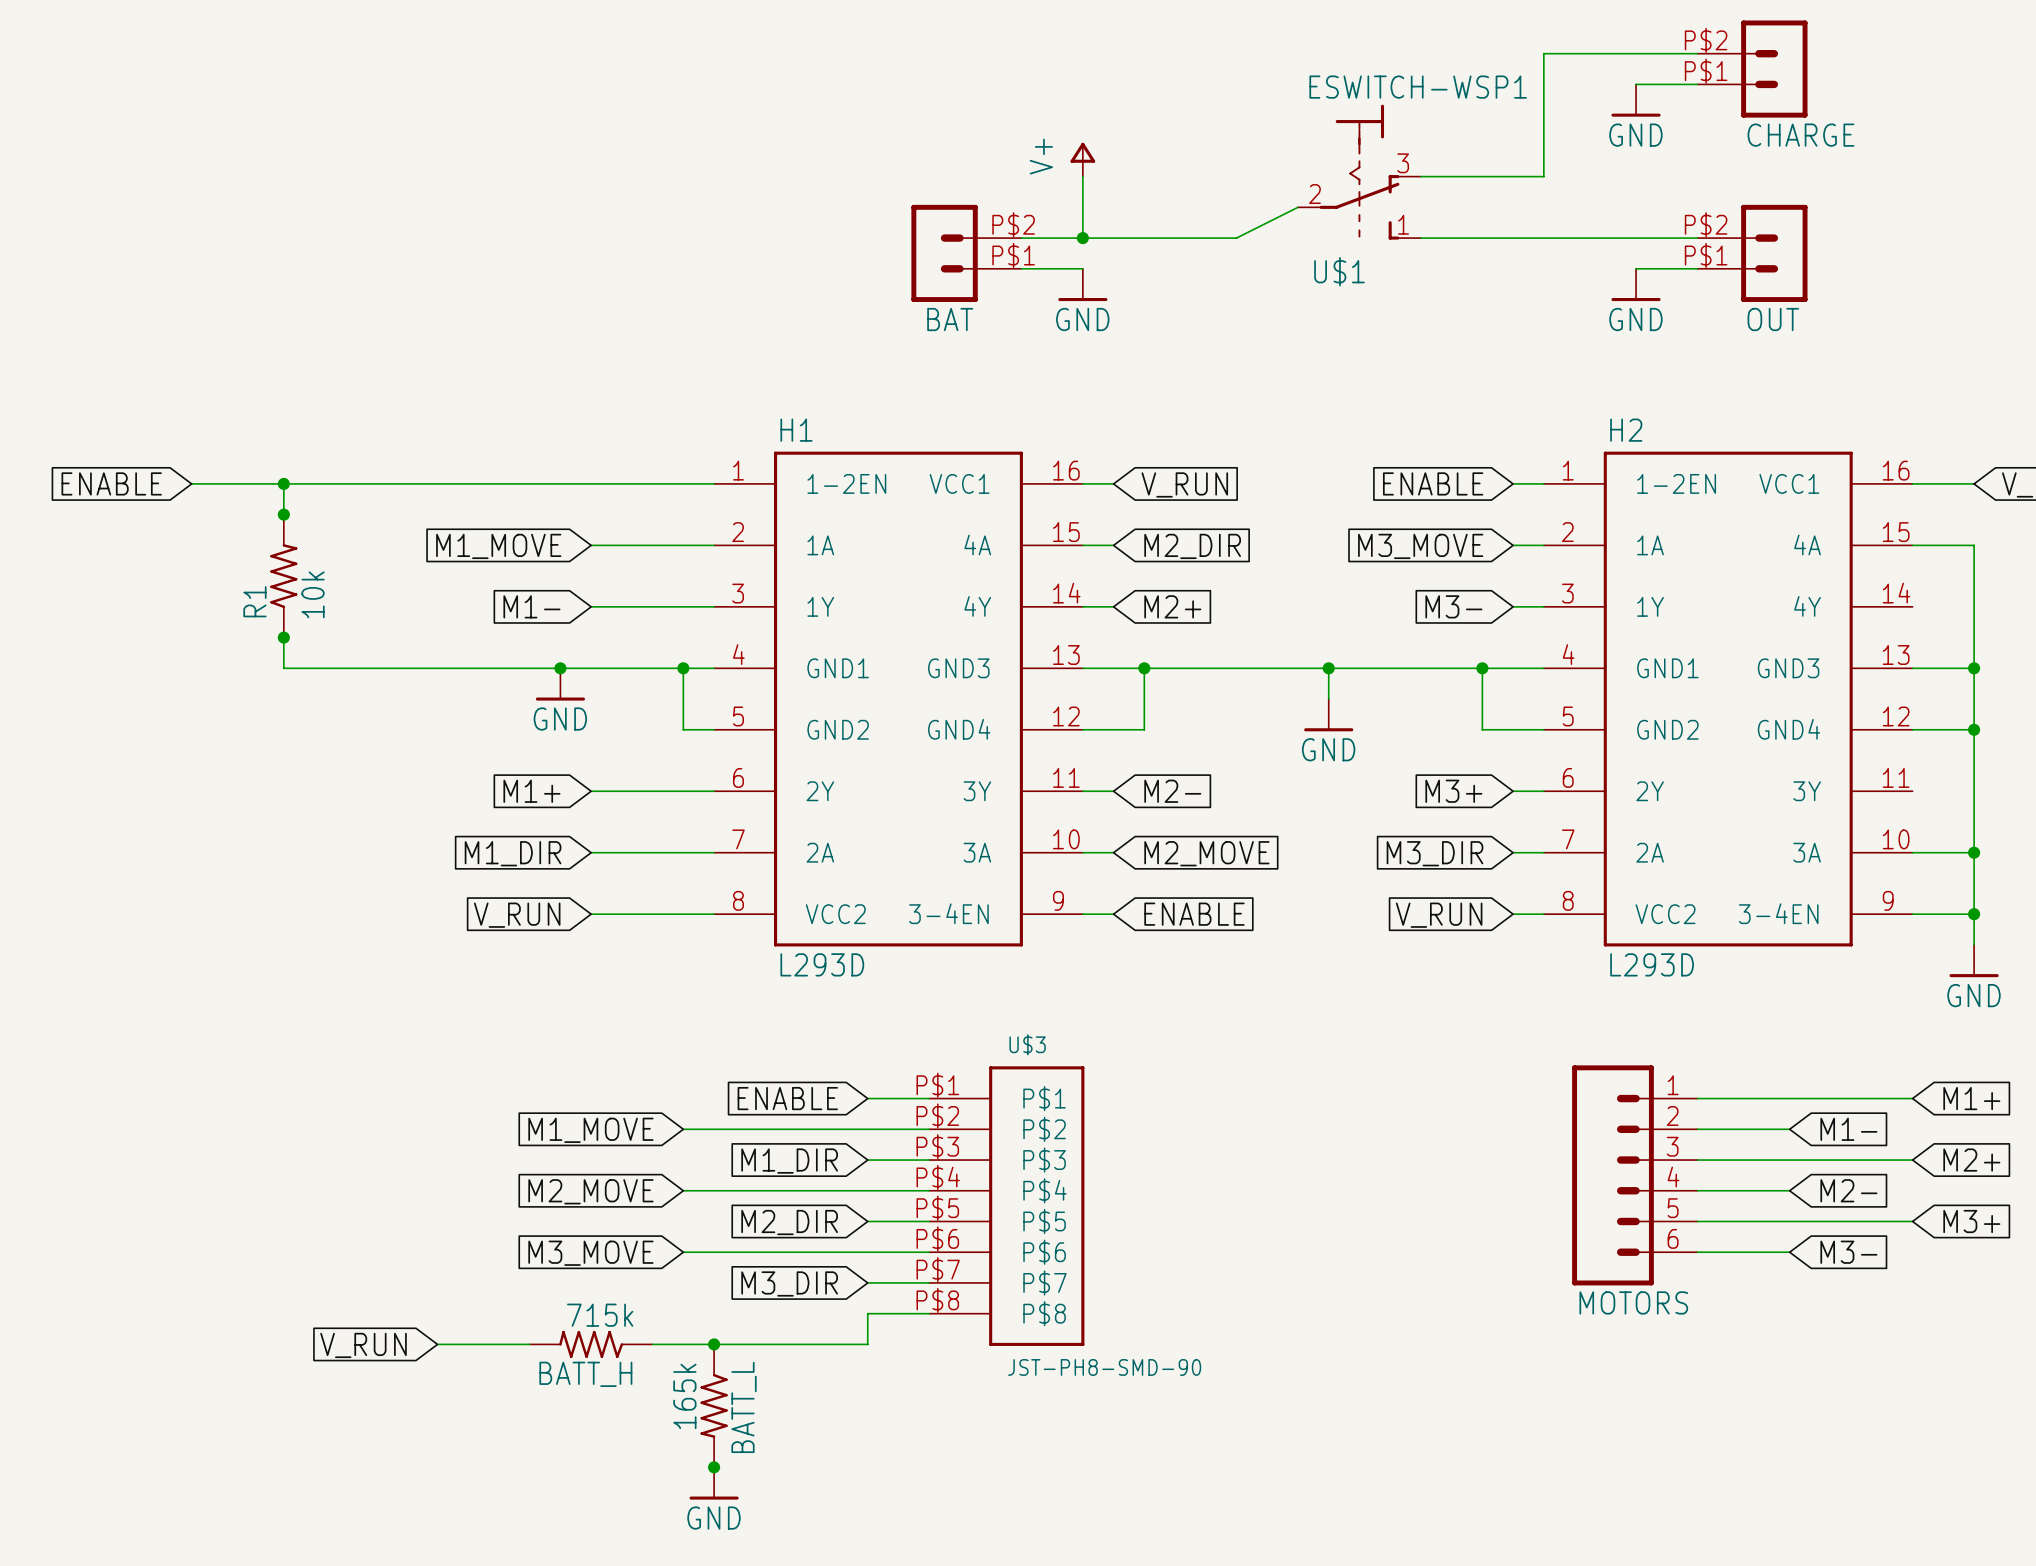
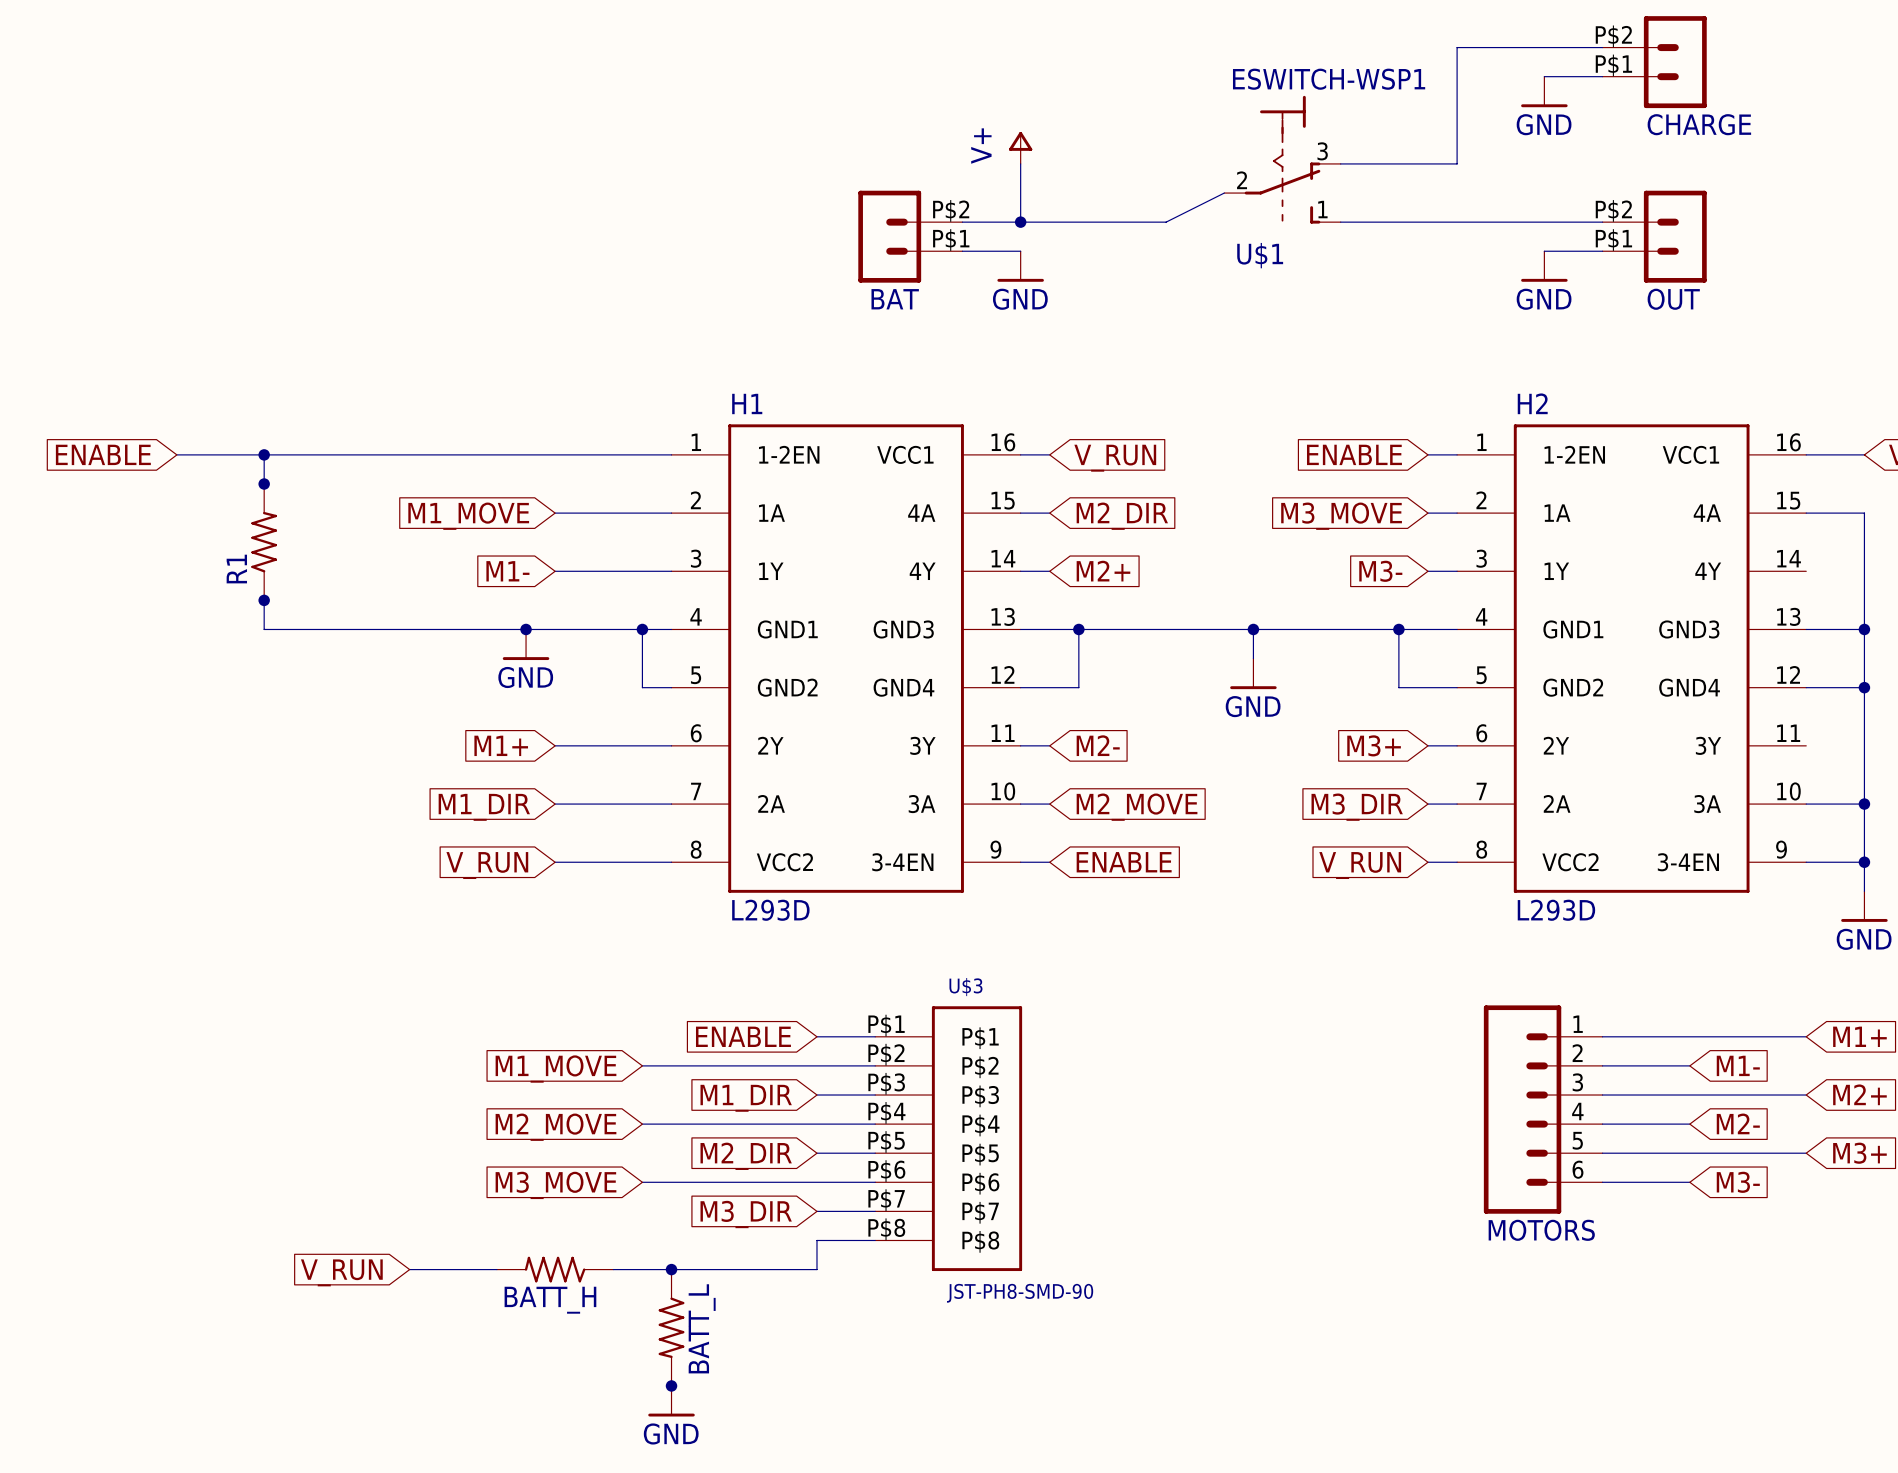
R1 value: 10k (313, 594) -> none
BATT_H value: 715k (600, 1315) -> none
BATT_L value: 165k (684, 1396) -> none

